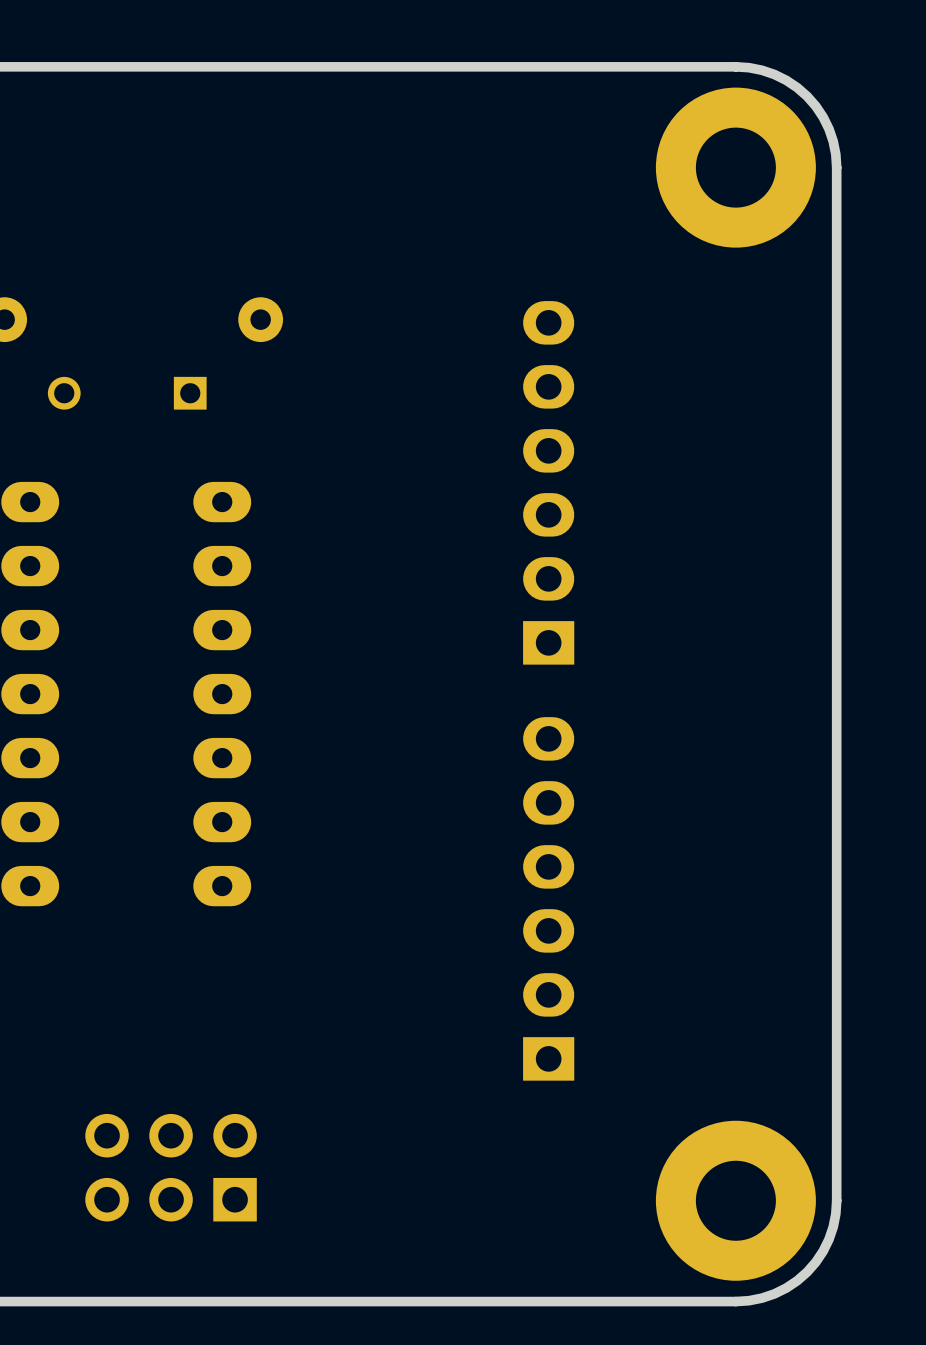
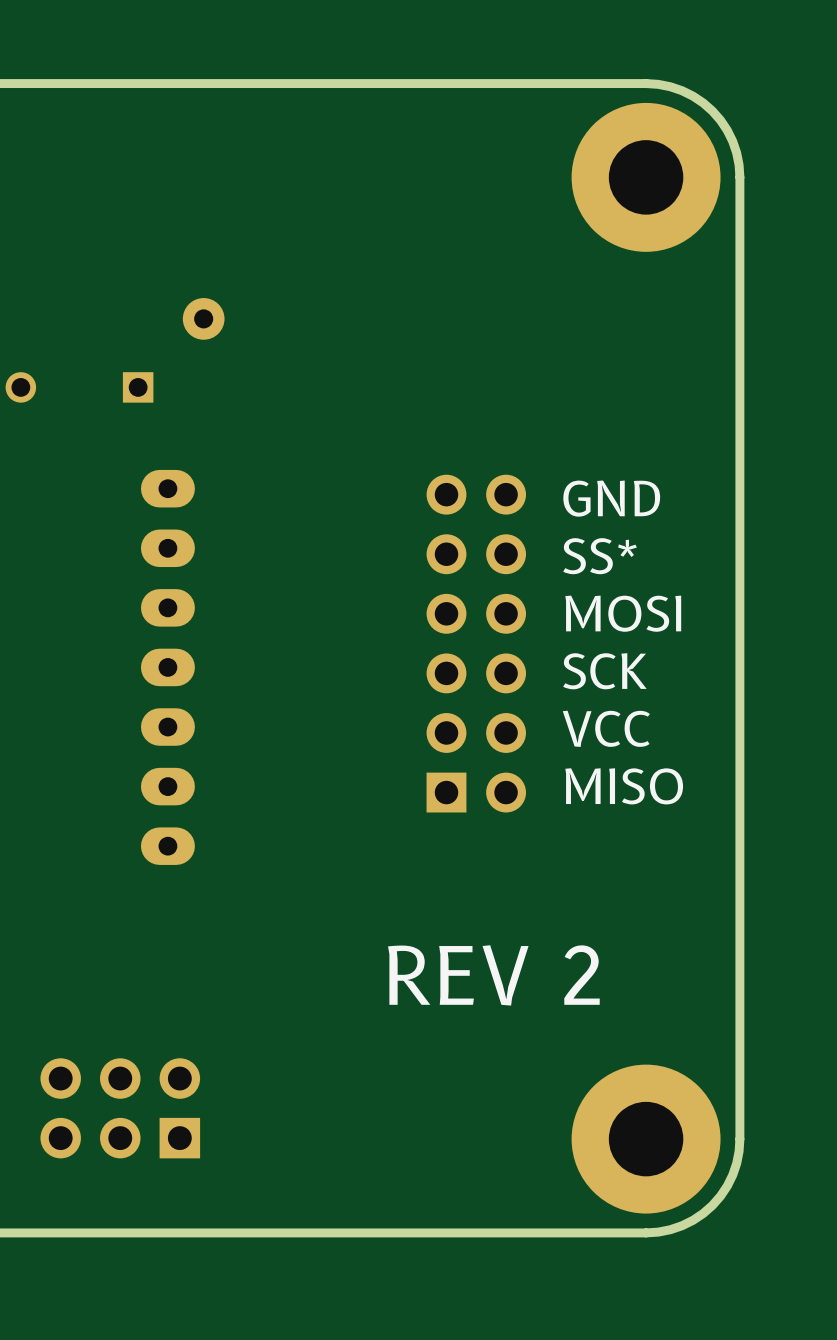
part: (548, 482) -> none
text: none -> GND (611, 498)
text: none -> SS* (599, 556)
text: none -> MOSI (623, 613)
part: none -> (476, 643)
text: none -> SCK (604, 671)
text: none -> VCC (606, 728)
text: none -> MISO (624, 786)
part: (548, 898) -> none
text: none -> REV 2 (493, 975)

